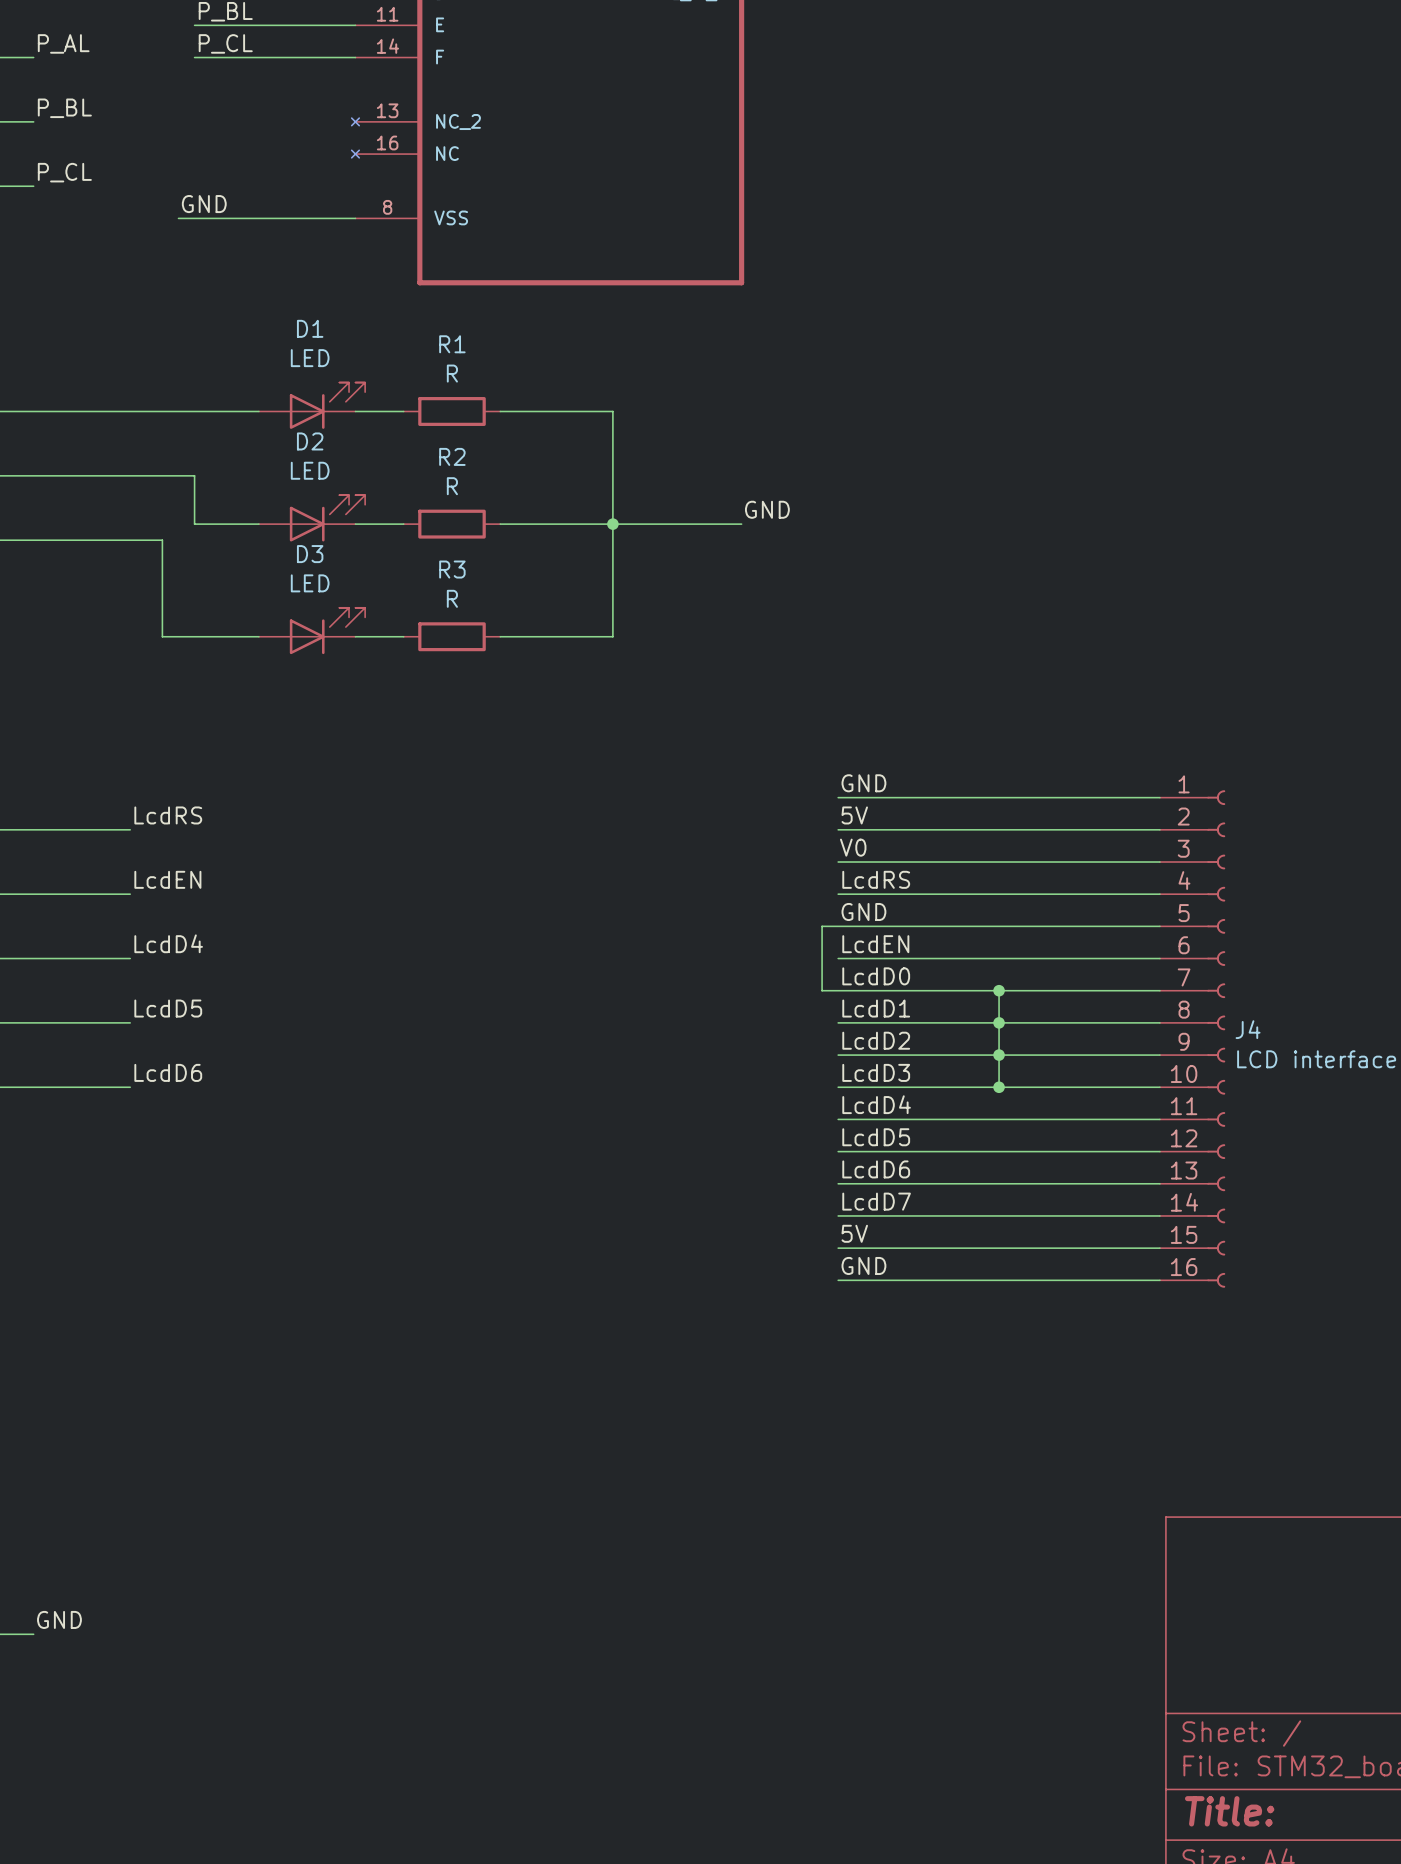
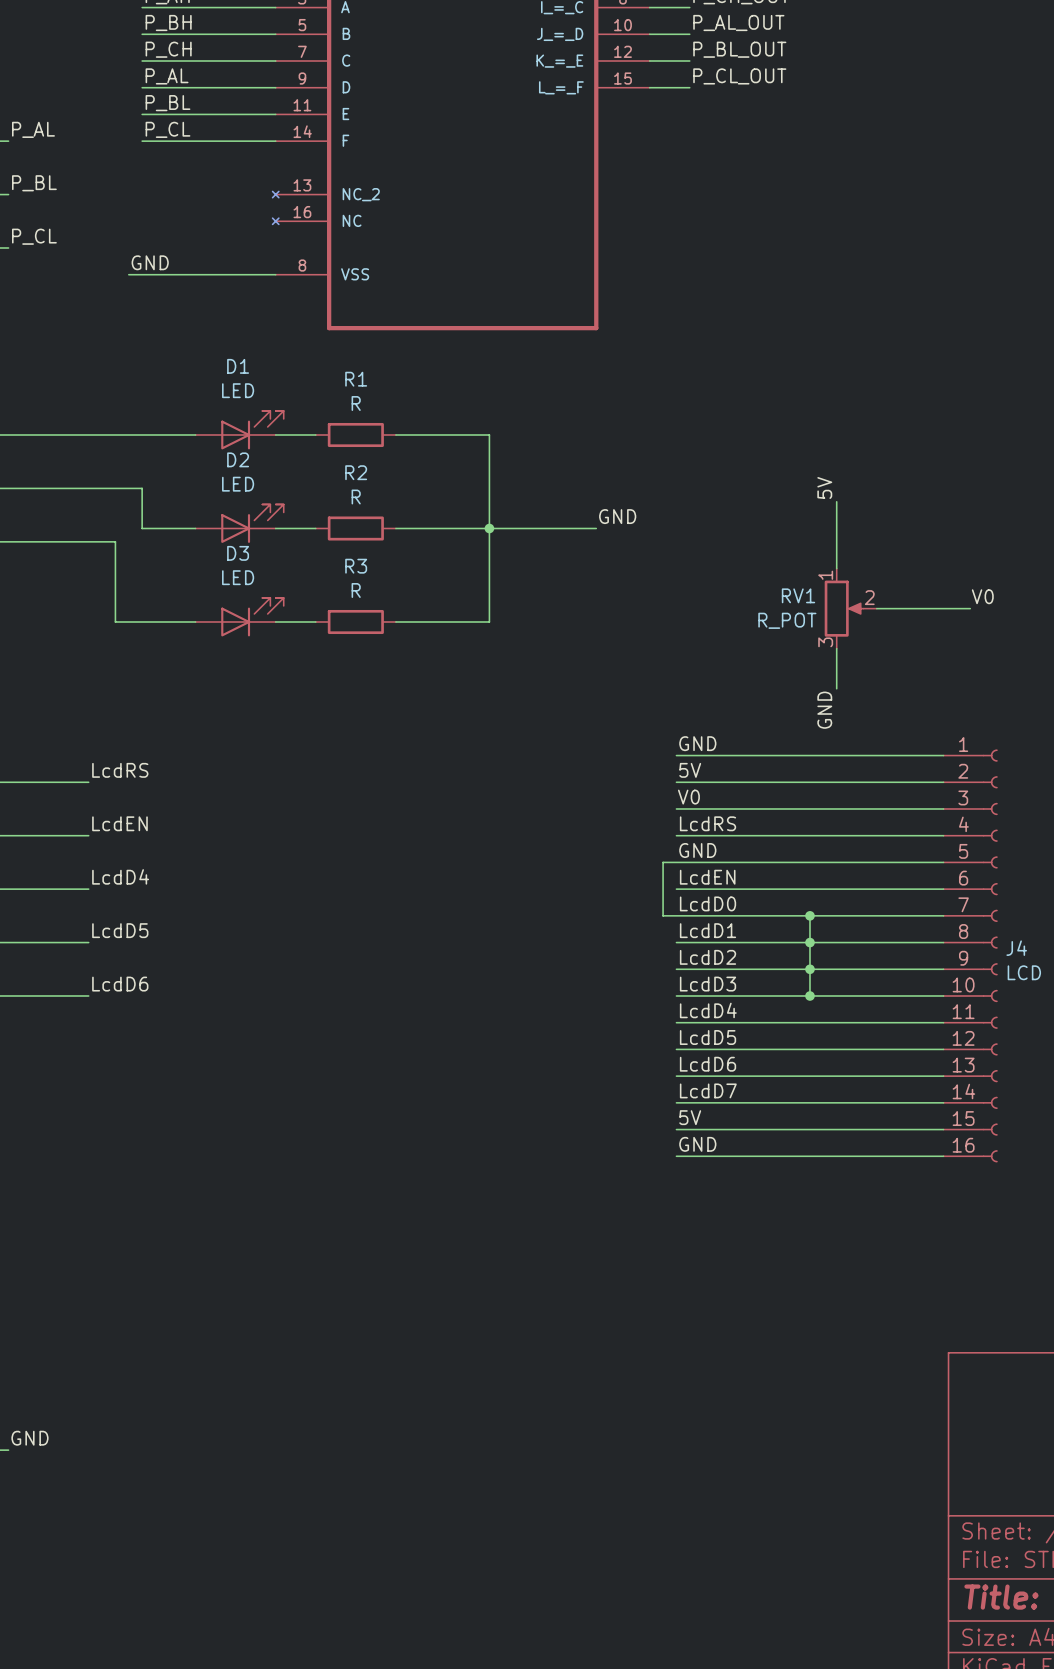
label: none -> 5V (824, 488)
wire: none -> (836, 501) (836, 568)
label: none -> V0 (982, 596)
RV1: none -> R_POT (850, 608)
wire: none -> (876, 608) (970, 608)
wire: none -> (836, 648) (836, 688)
label: none -> GND (824, 710)

